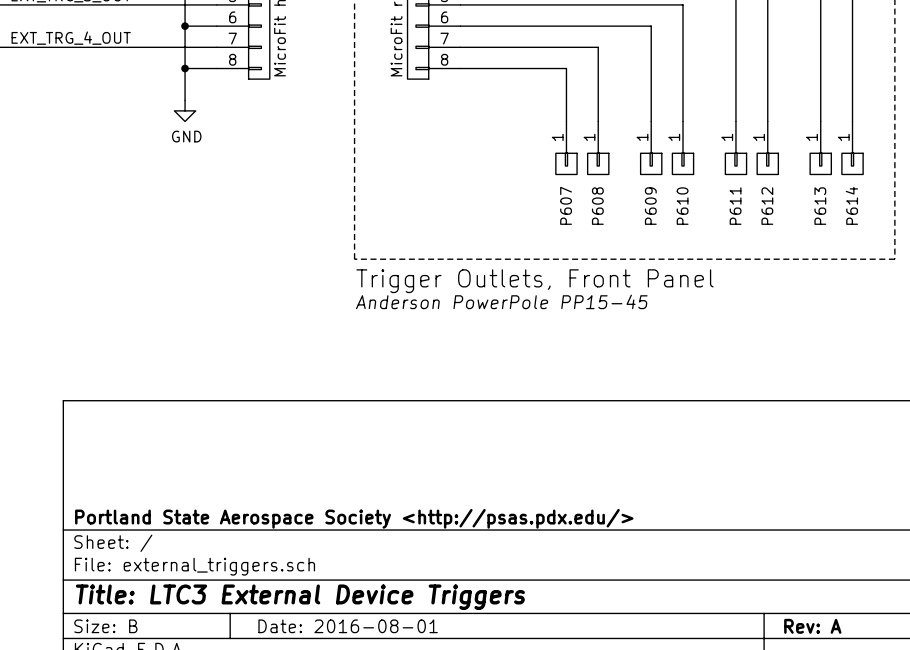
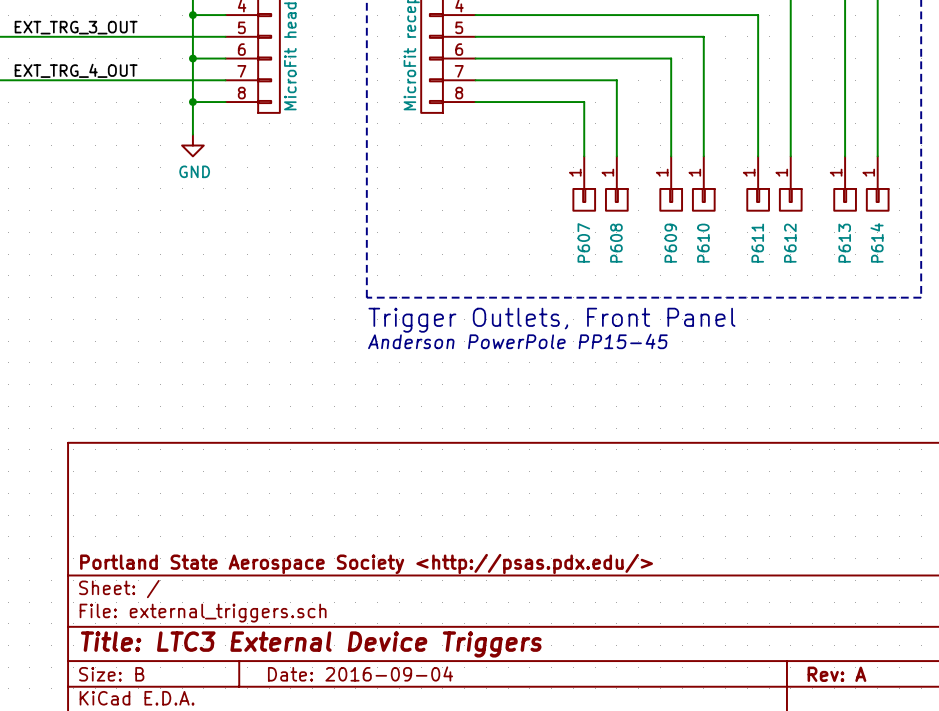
title block: Date: 2016-08-01 (348, 626) -> Date: 2016-09-04 (360, 673)

